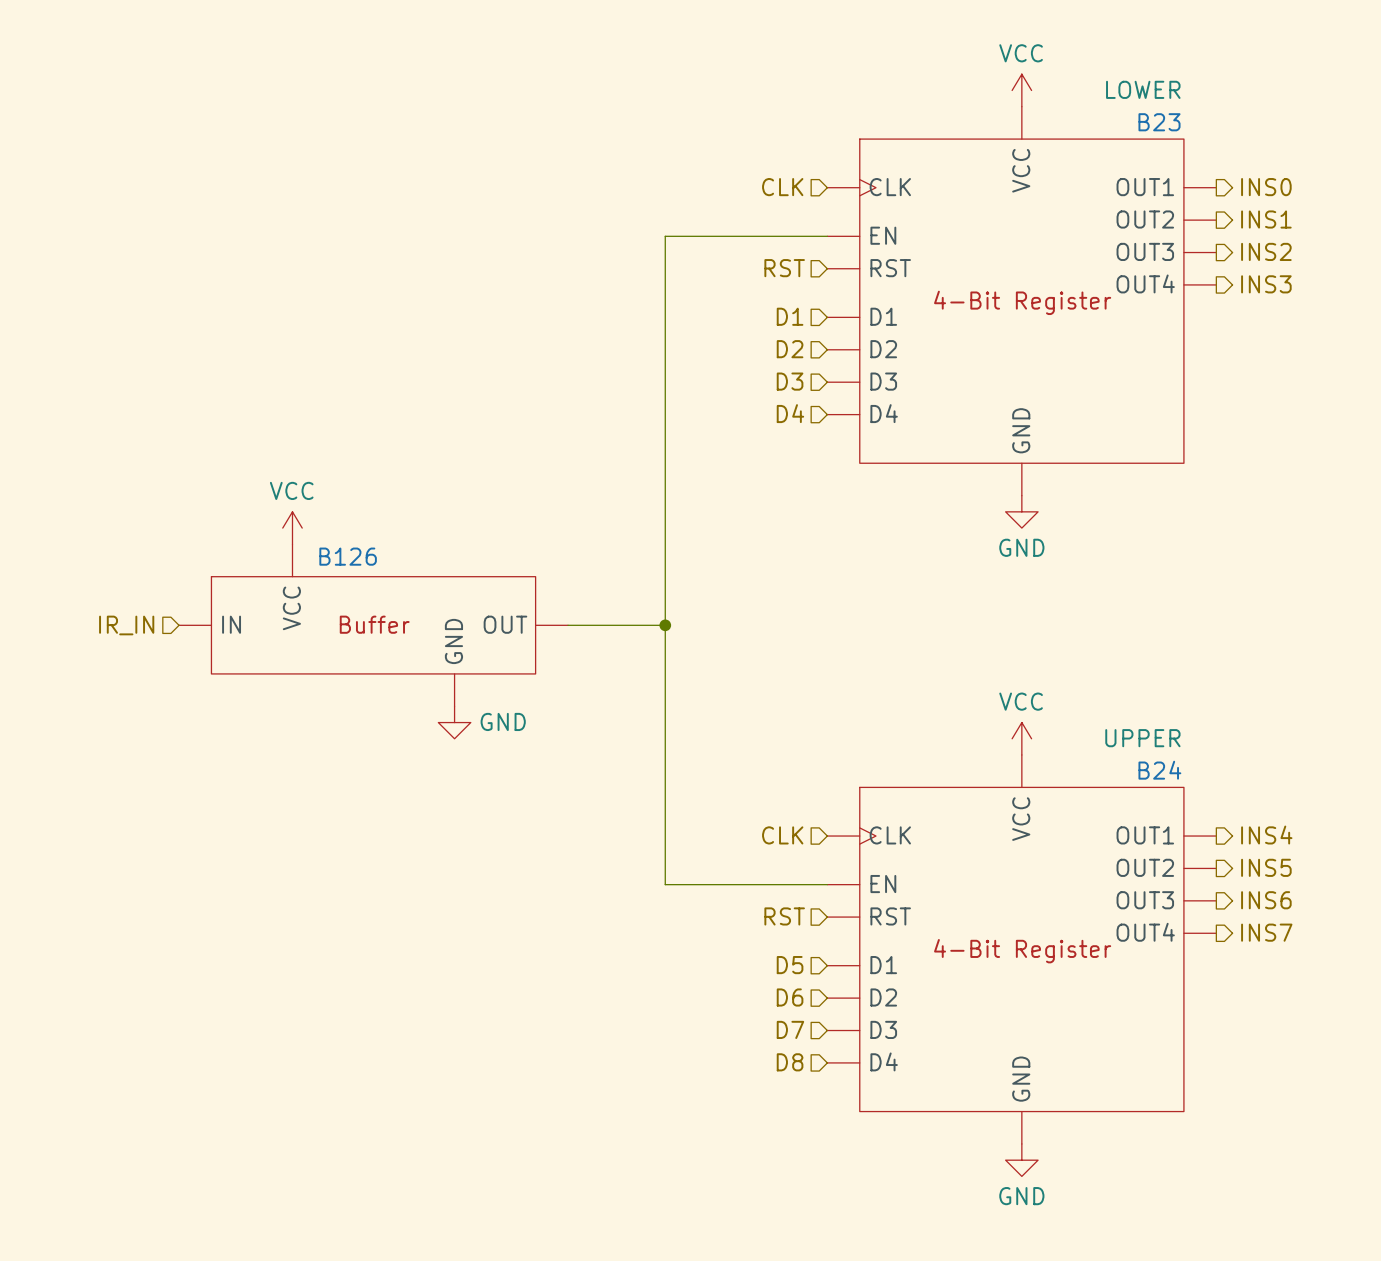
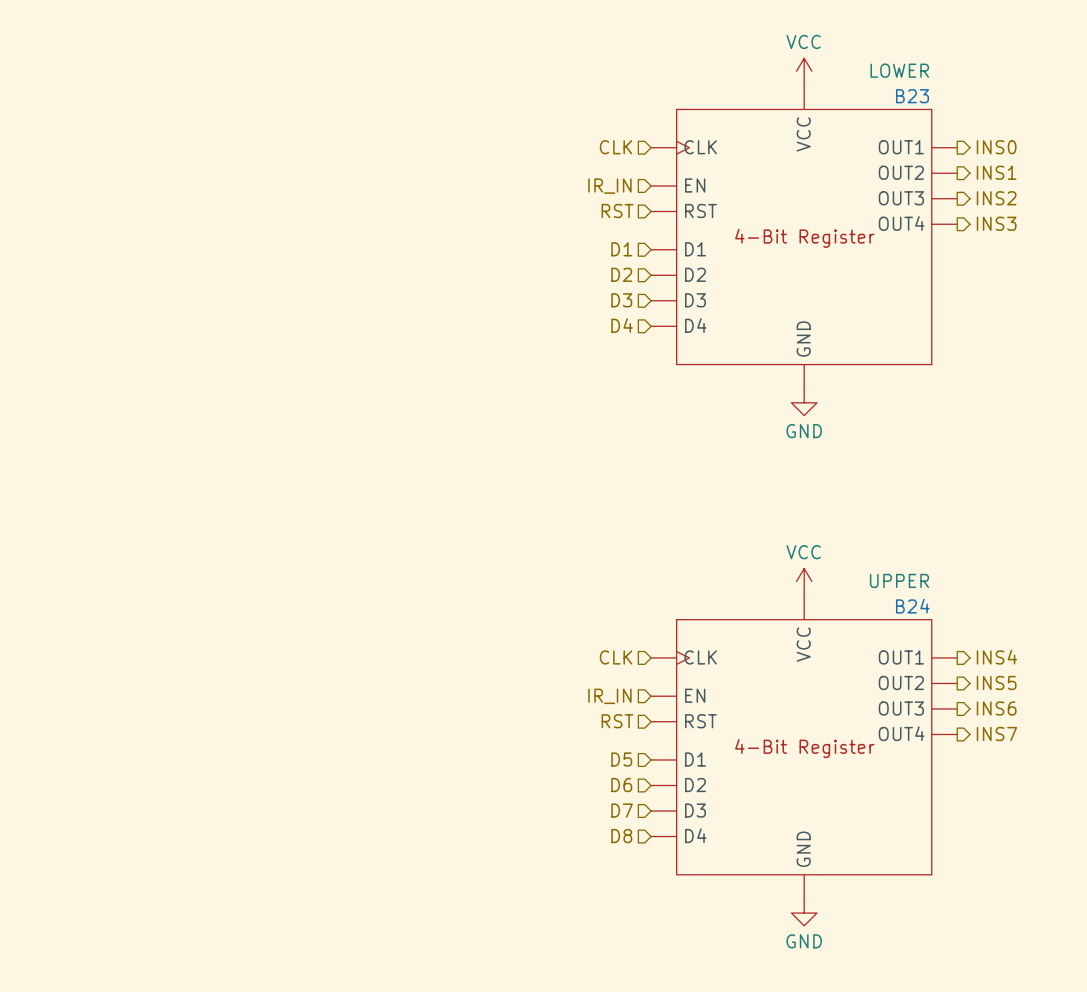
hierarchical label: none -> IR_IN (609, 186)
wire: (827, 236) (665, 236) (665, 884) (827, 884) -> none
power symbol: VCC (292, 528) -> none
hierarchical label: IR_IN (126, 625) -> none
B126: (373, 625) -> none
wire: (568, 625) (665, 625) -> none
junction: (665, 625) -> none
power symbol: GND (454, 722) -> none
hierarchical label: none -> IR_IN (609, 696)

